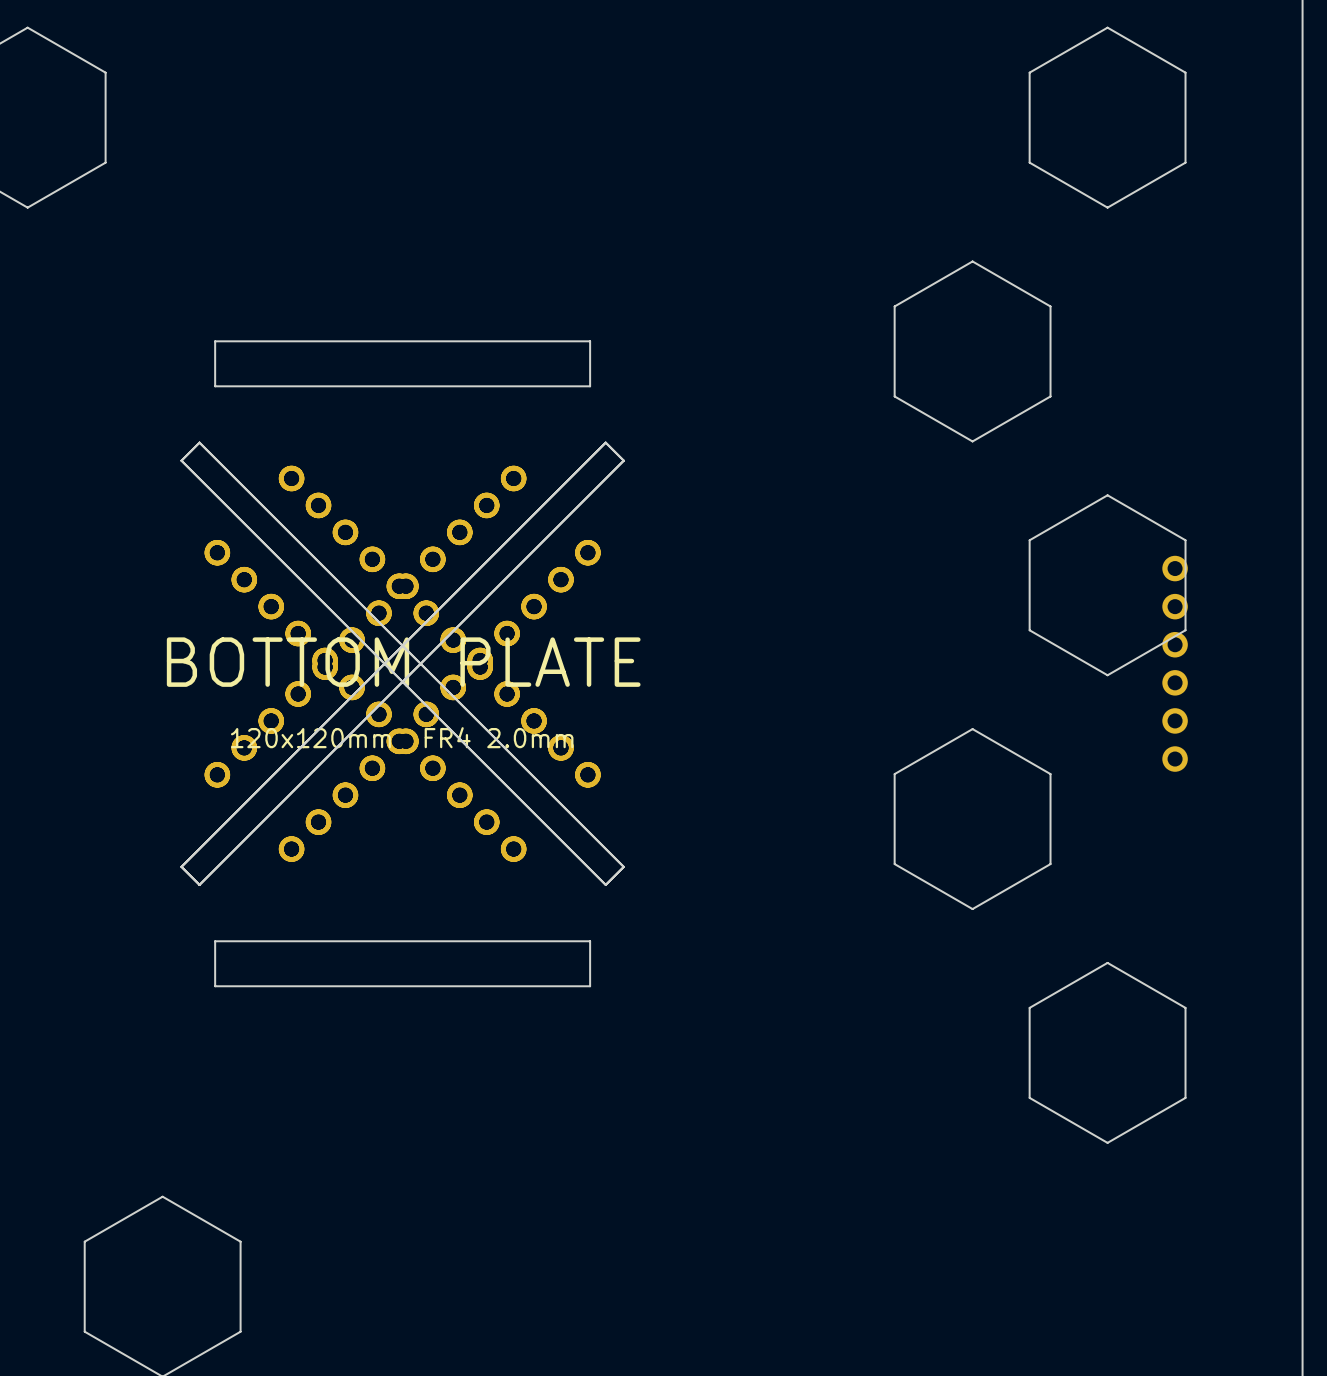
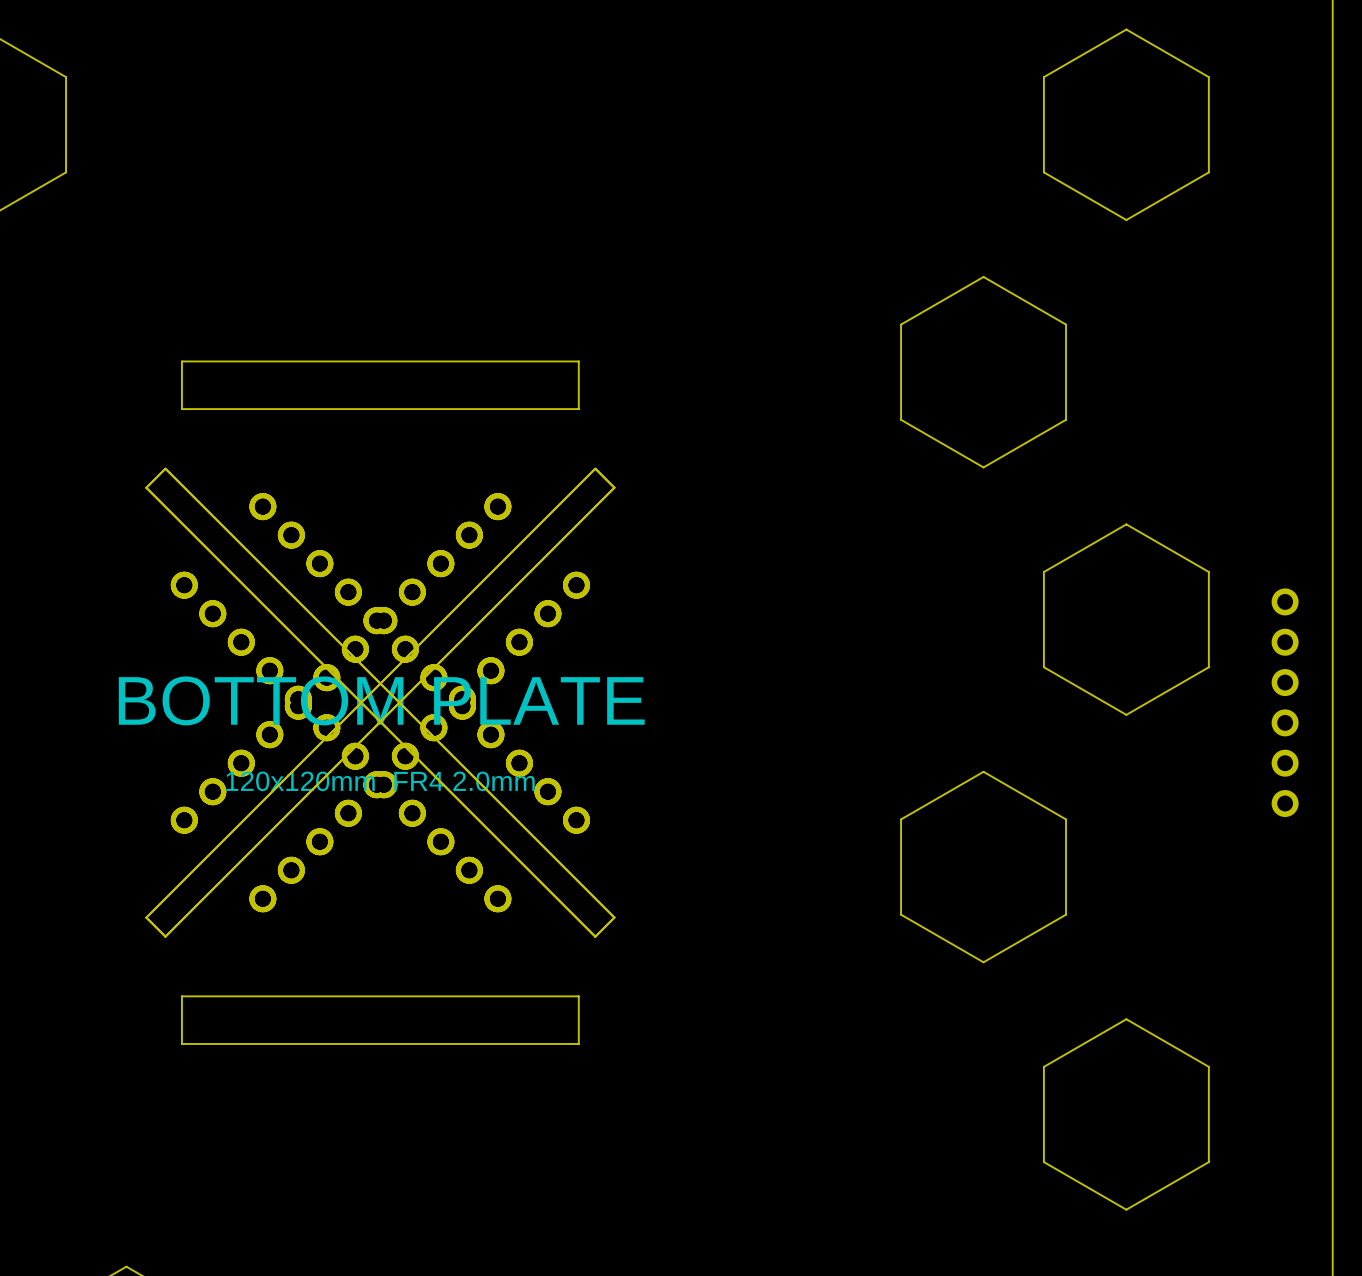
part: (1175, 568) -> none
part: none -> (1285, 601)
part: (1175, 606) -> none
part: none -> (1285, 642)
part: (1175, 644) -> none
part: none -> (1285, 682)
part: (1175, 682) -> none
part: none -> (1285, 722)
part: (1175, 720) -> none
part: none -> (1285, 763)
part: (1175, 759) -> none
part: none -> (1285, 803)

